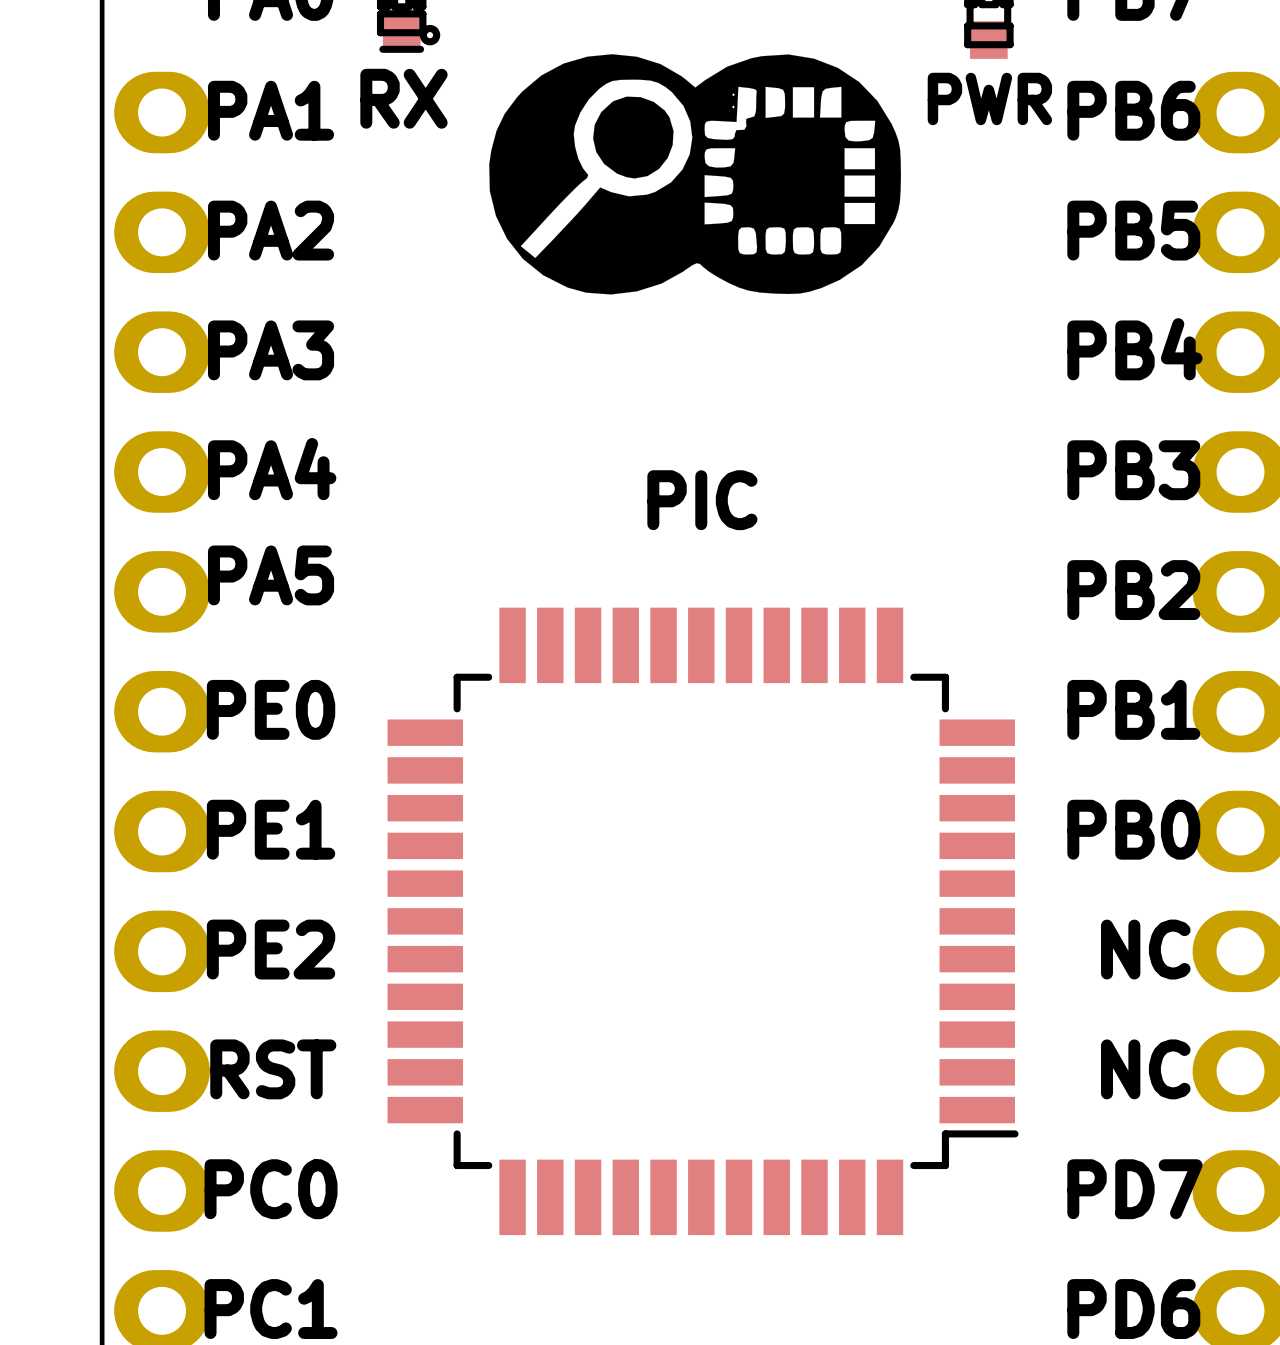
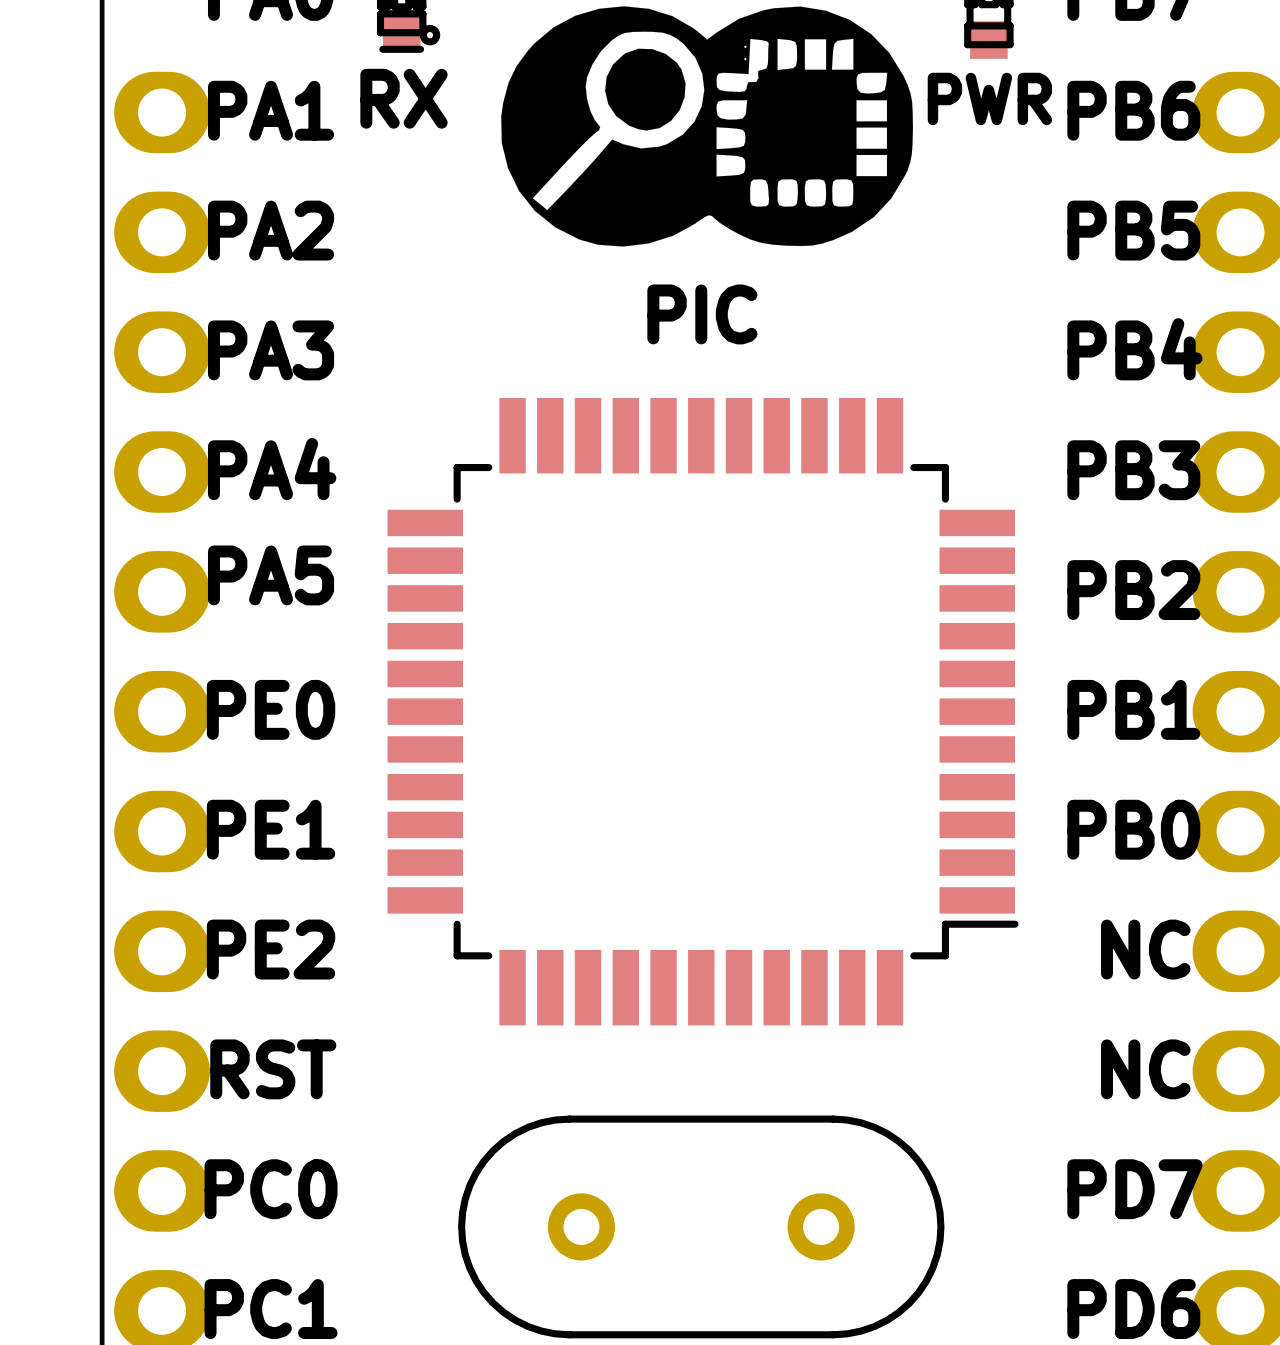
drawing position: (695, 174) -> (707, 126)
text position: PIC (702, 500) -> PIC (702, 314)
part position: (703, 921) -> (703, 711)
part: none -> (701, 1226)

